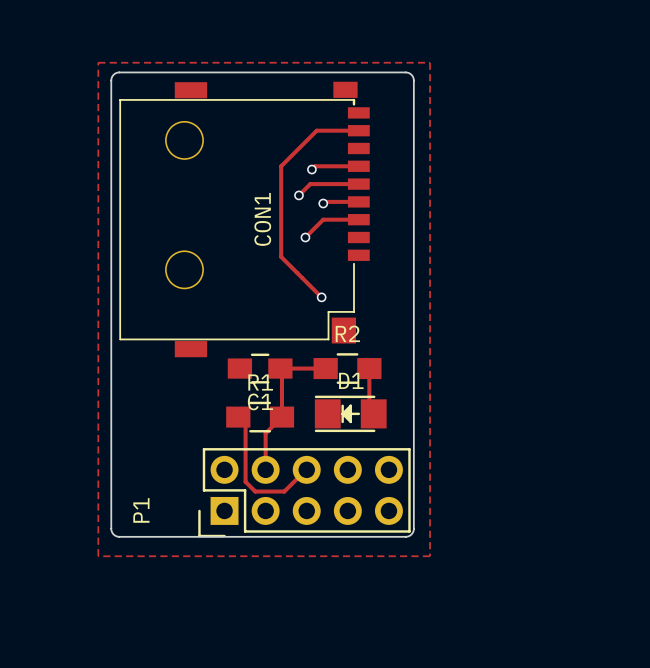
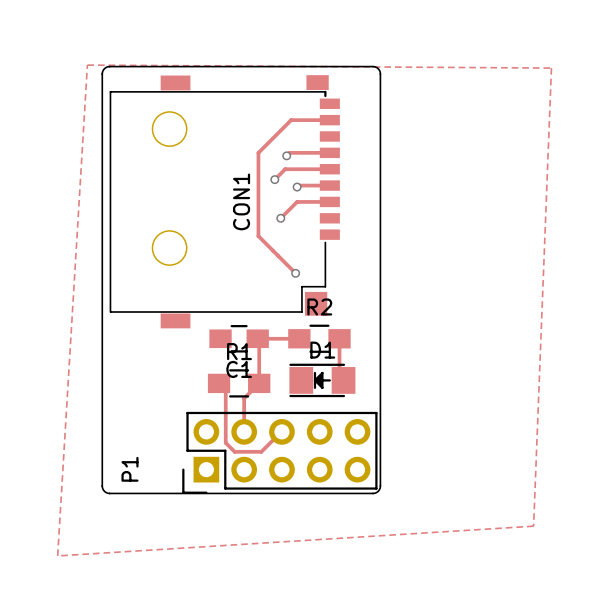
zone outline: (98, 62) (98, 556) (430, 556) (430, 62) (98, 62) -> (87, 65) (57, 555) (533, 526) (551, 68) (87, 65)

